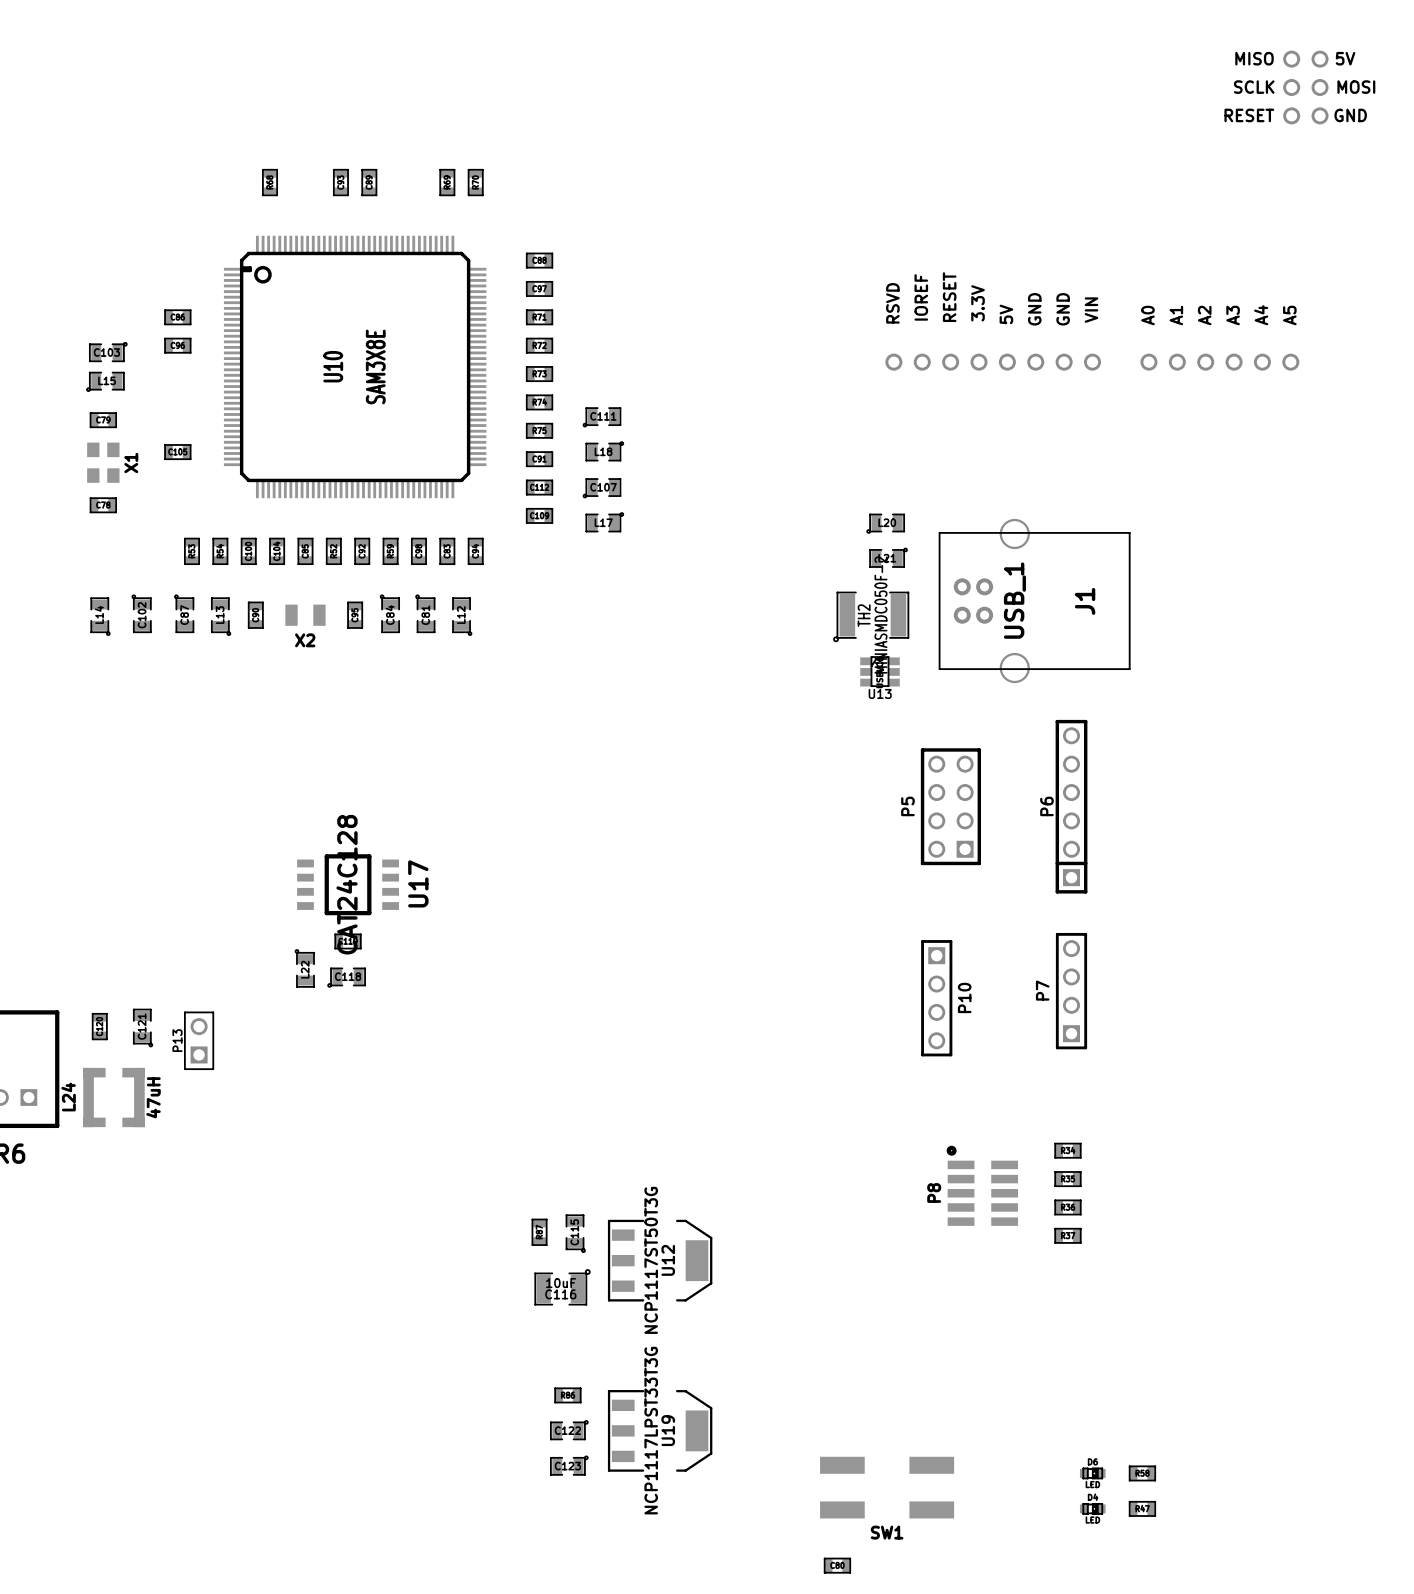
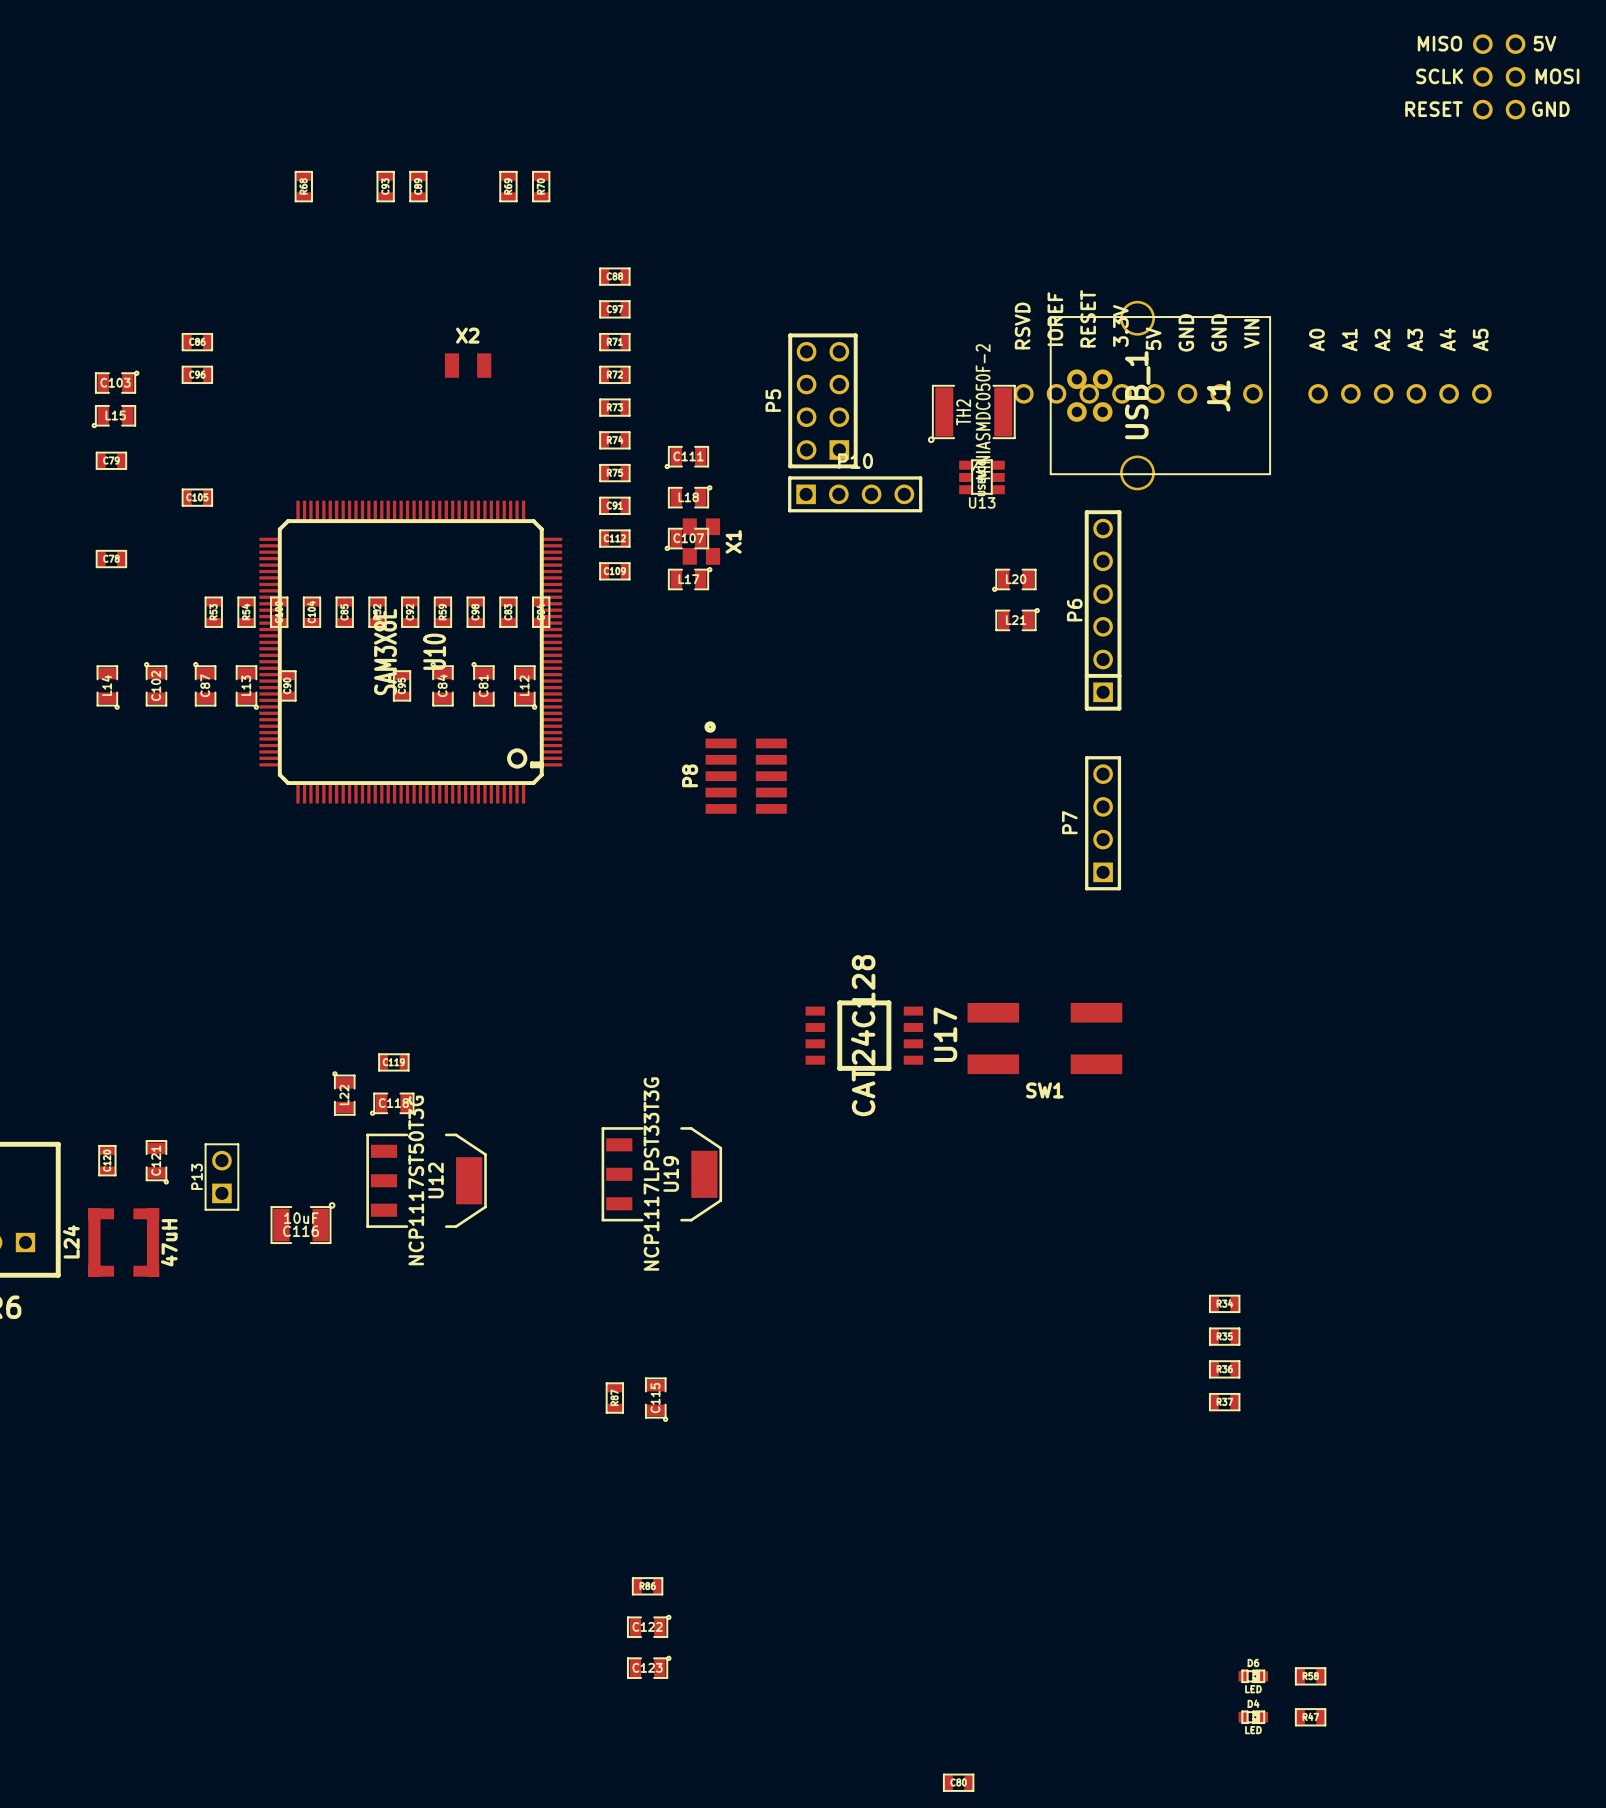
U10 rotation: 0° (355, 366) -> 180° (410, 652)
U10 position: (355, 366) -> (410, 652)
X1 position: (103, 462) -> (701, 541)
J1 position: (1034, 601) -> (1160, 395)
X2 position: (305, 615) -> (468, 365)
TH2 position: (871, 616) -> (971, 413)
X2 name position: X2 (305, 640) -> X2 (467, 335)
U13 position: (880, 671) -> (981, 477)
P5 position: (950, 806) -> (822, 400)
P6 position: (1071, 806) -> (1103, 610)
U17 position: (348, 884) -> (864, 1035)
P7 position: (1071, 991) -> (1103, 823)
P10 rotation: 0° (936, 998) -> 90° counterclockwise (855, 494)
P10 position: (936, 998) -> (855, 494)
P8 position: (982, 1185) -> (745, 767)
U12 position: (660, 1260) -> (426, 1180)
C116 position: (562, 1287) -> (302, 1223)
U19 position: (660, 1430) -> (661, 1174)
SW1 position: (887, 1487) -> (1044, 1038)

